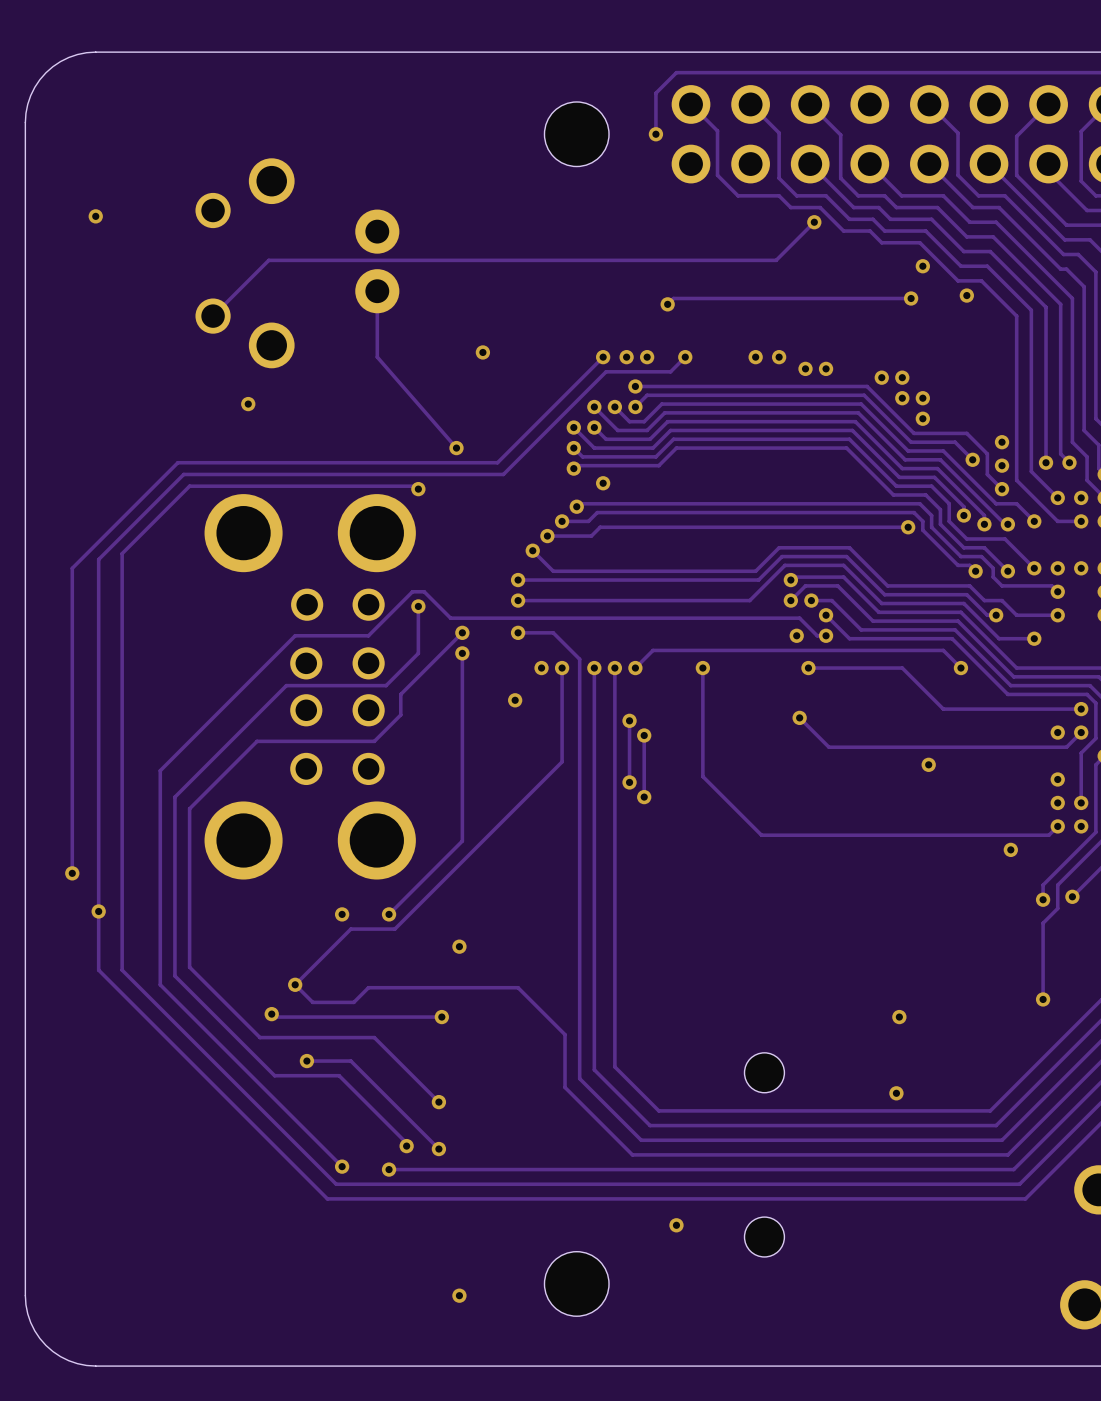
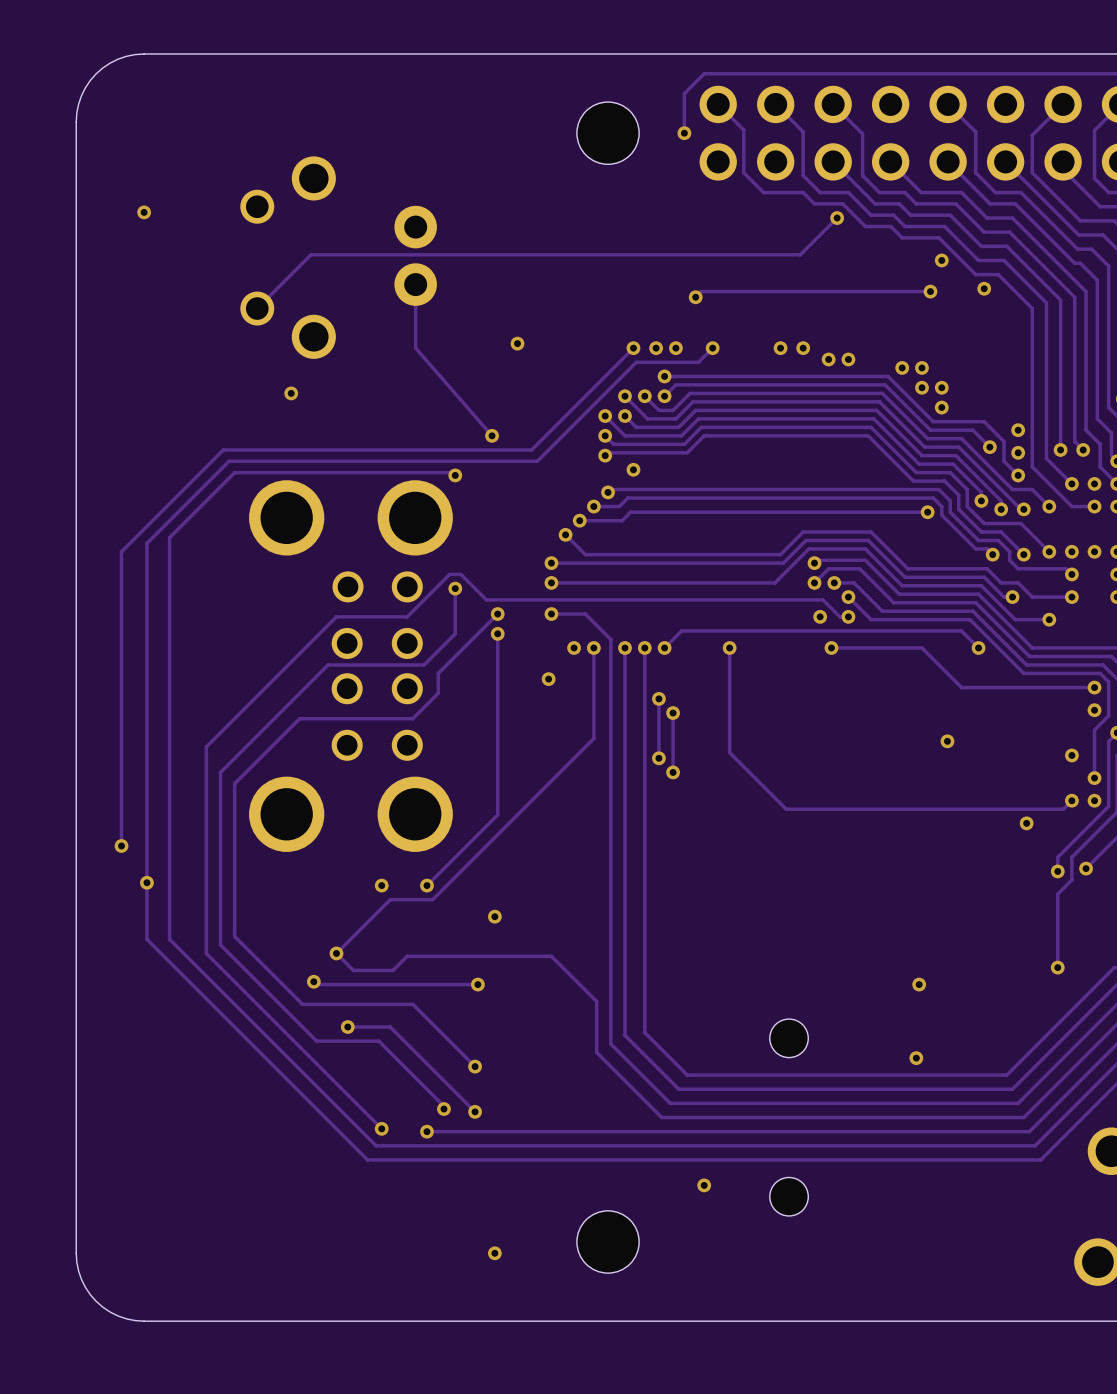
track: (799, 717) (828, 747) (1066, 747) (1081, 732) -> none
via: (799, 717) -> none
via: (1057, 732) -> none
via: (1057, 802) -> none

